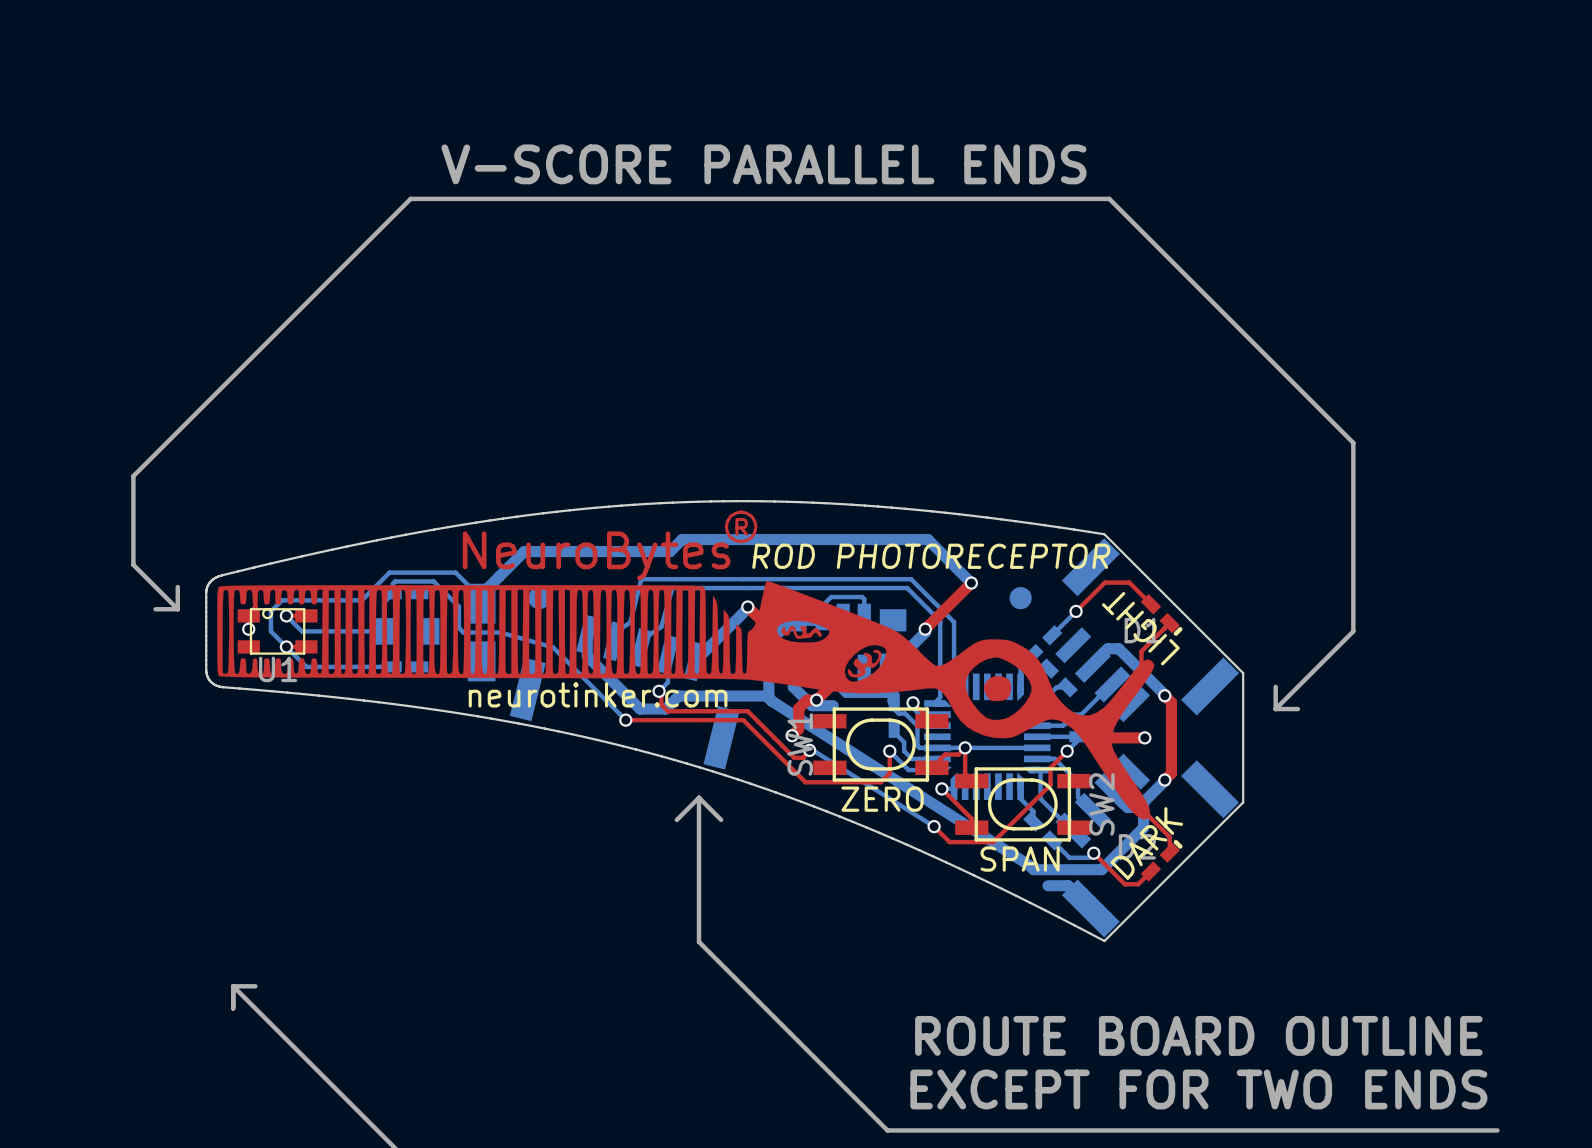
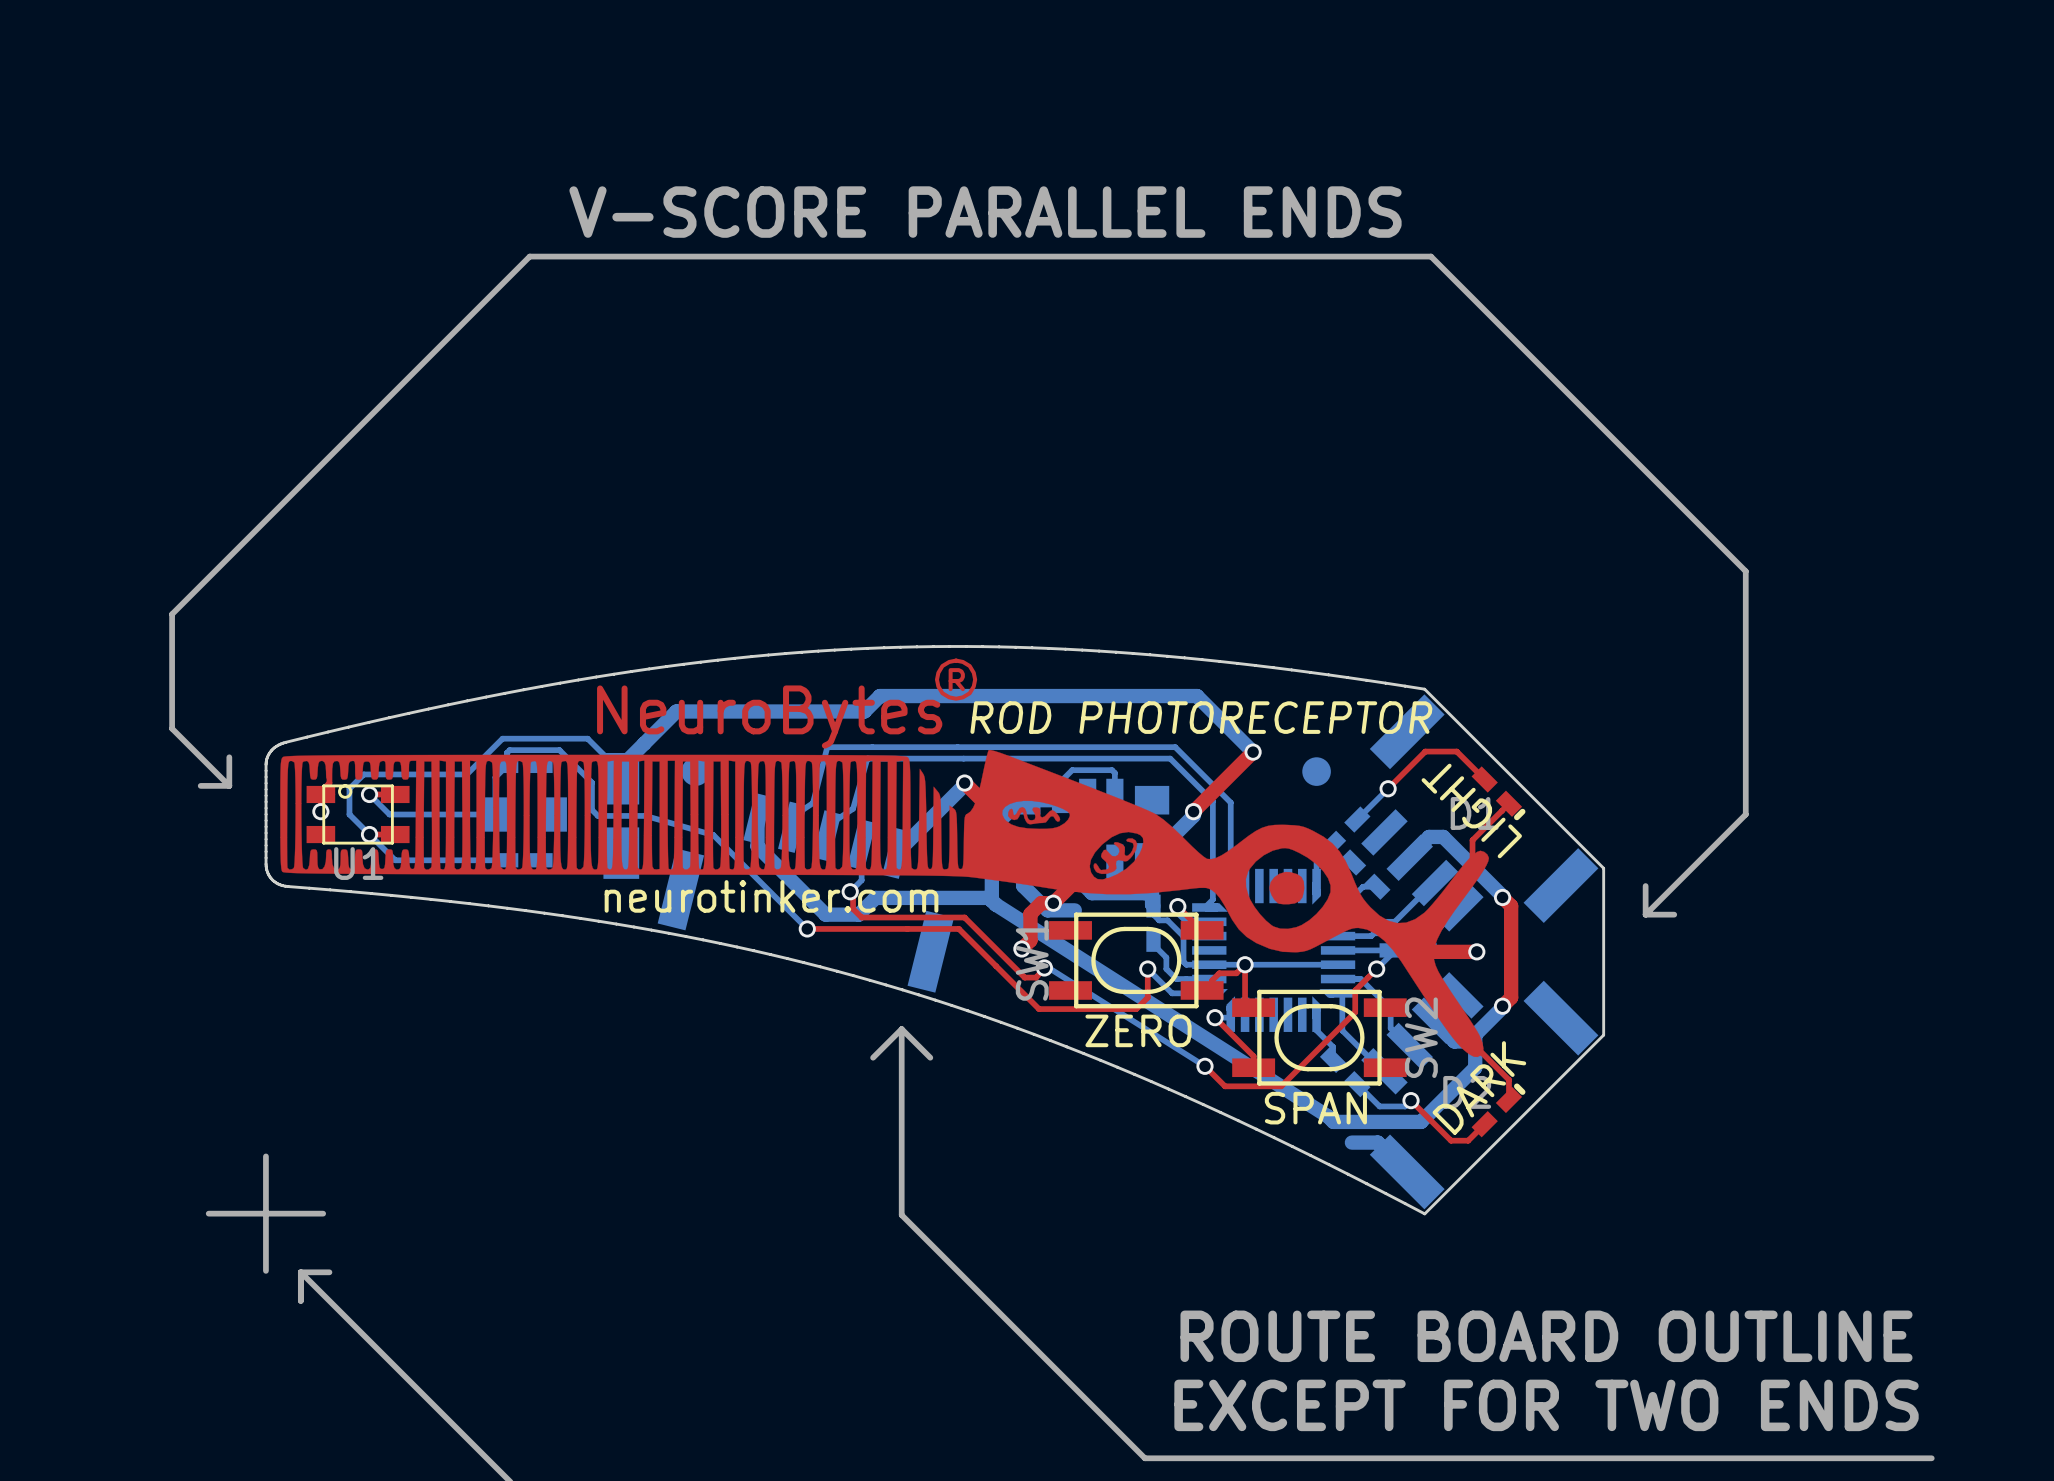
line: none -> (265, 1156) (265, 1270)
line: none -> (208, 1213) (323, 1213)

